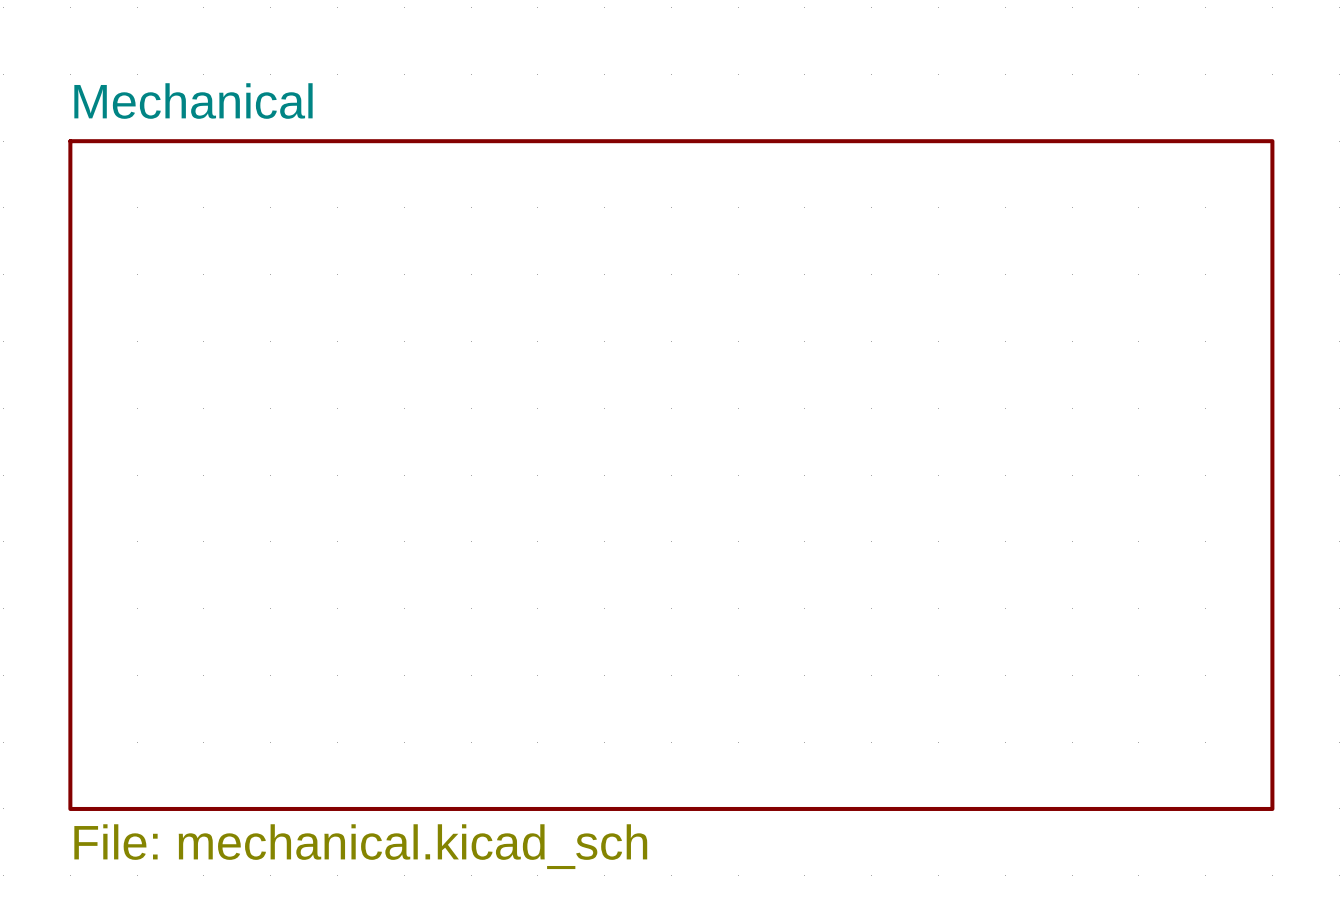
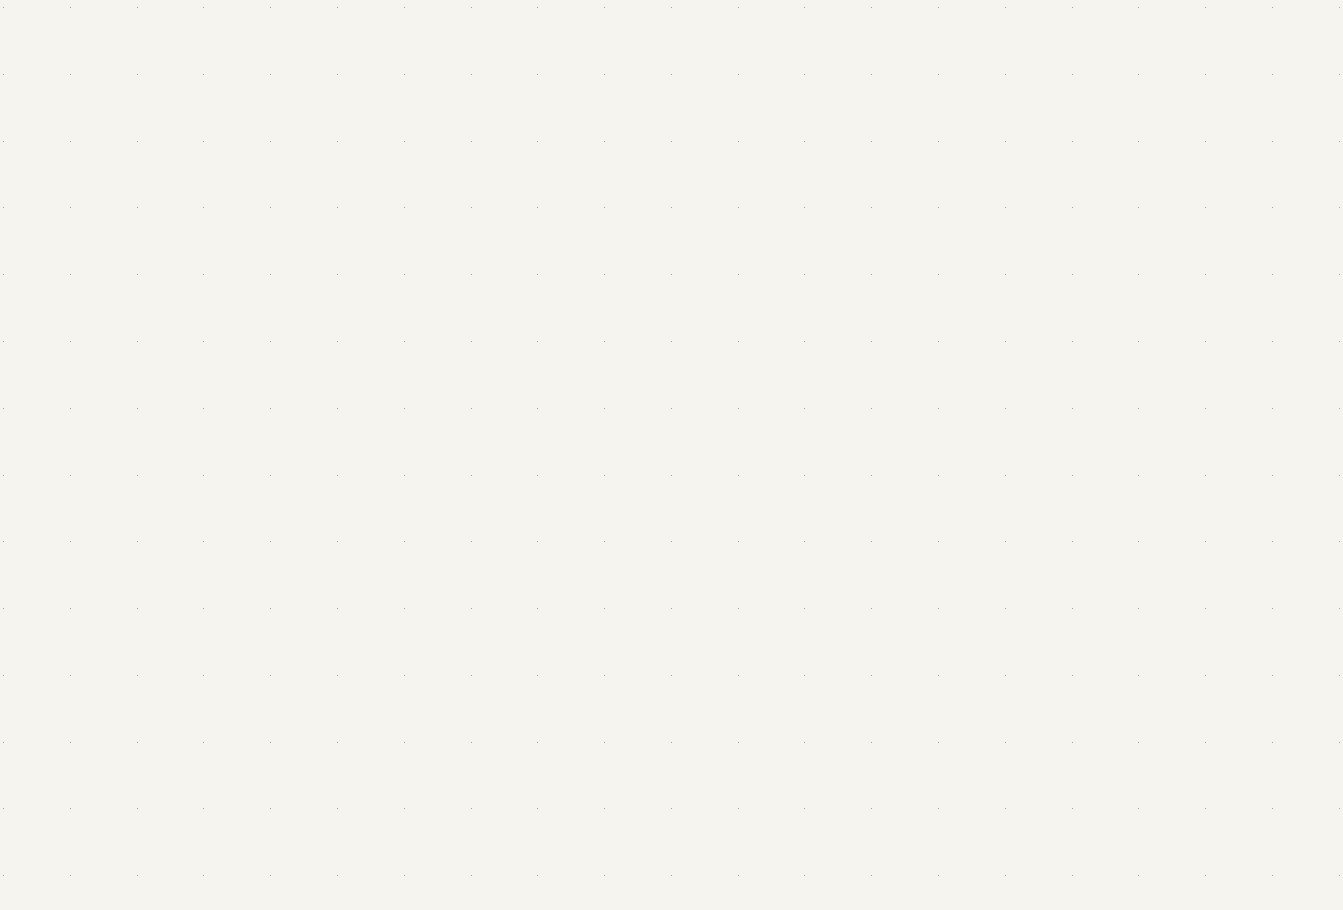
sheet Mechanical: File: mechanical.kicad_sch (671, 475) -> none

